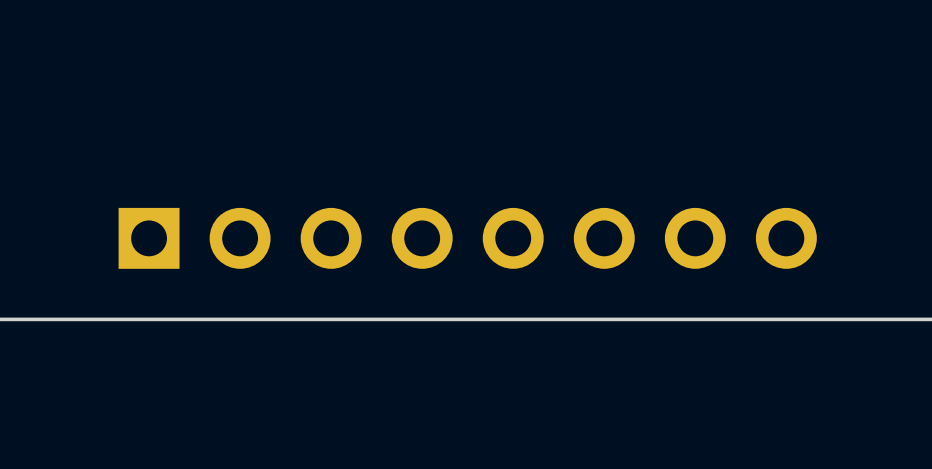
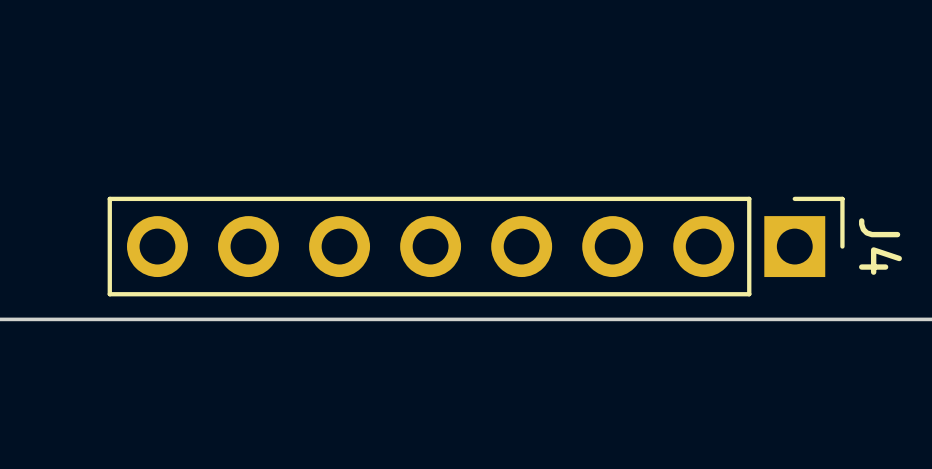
J4 side: top (467, 238) -> bottom (476, 246)

